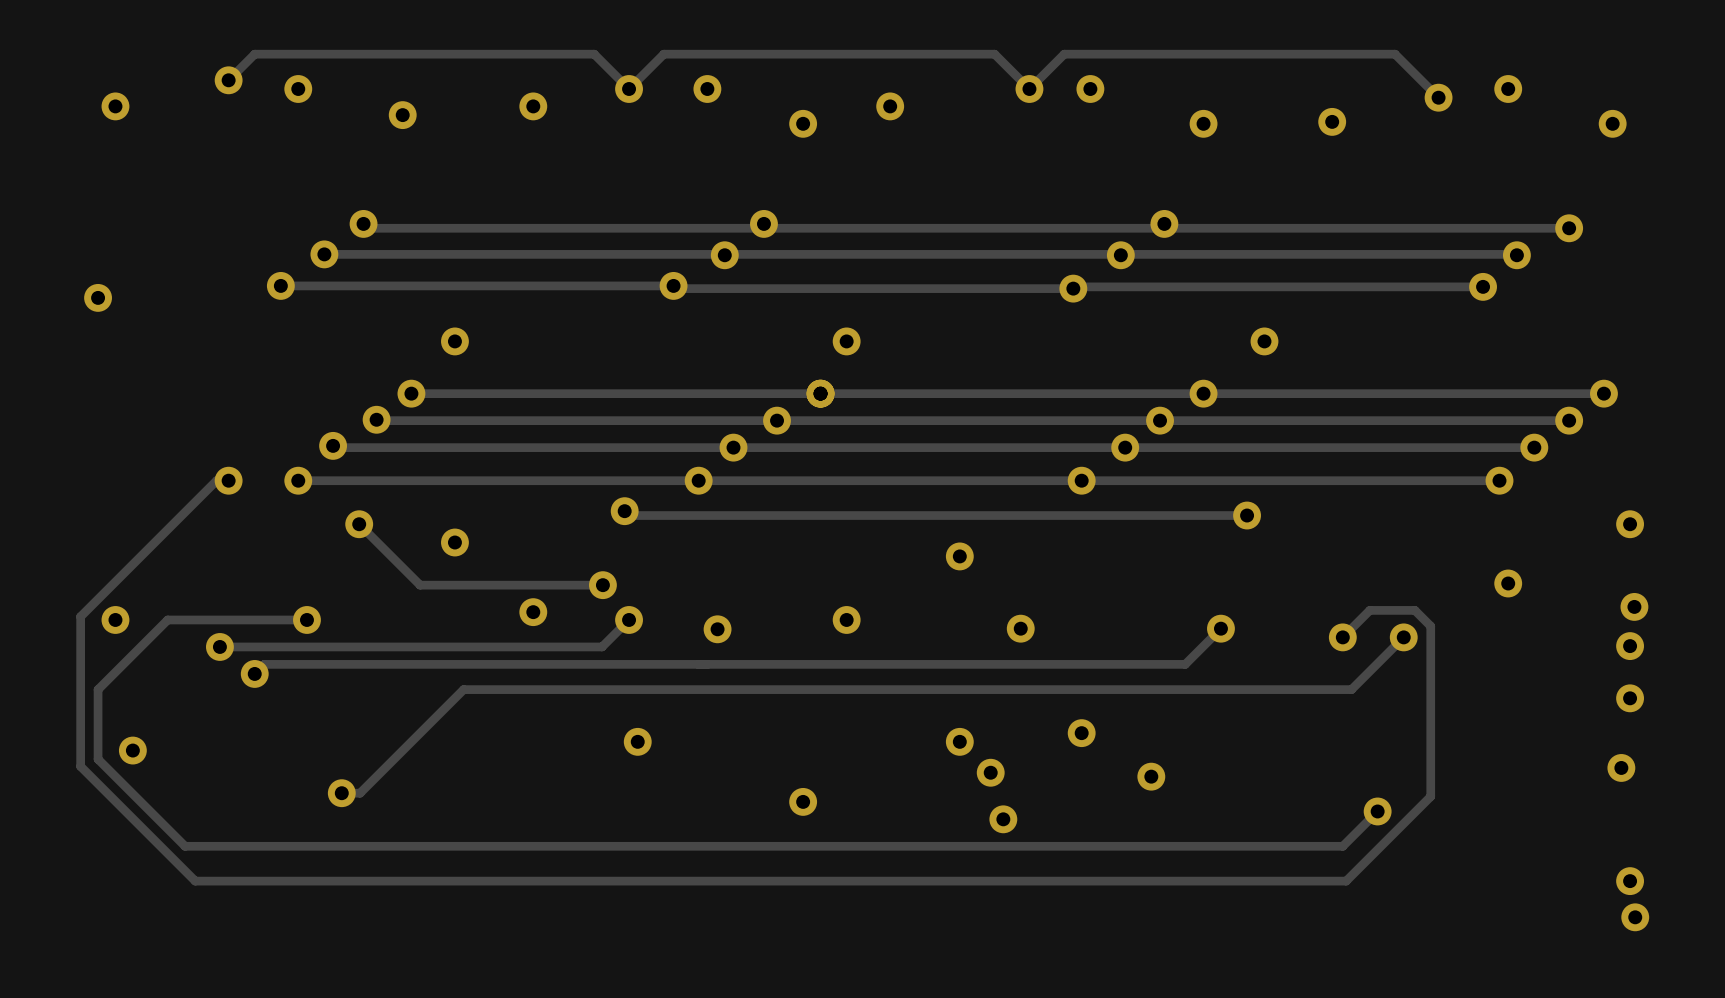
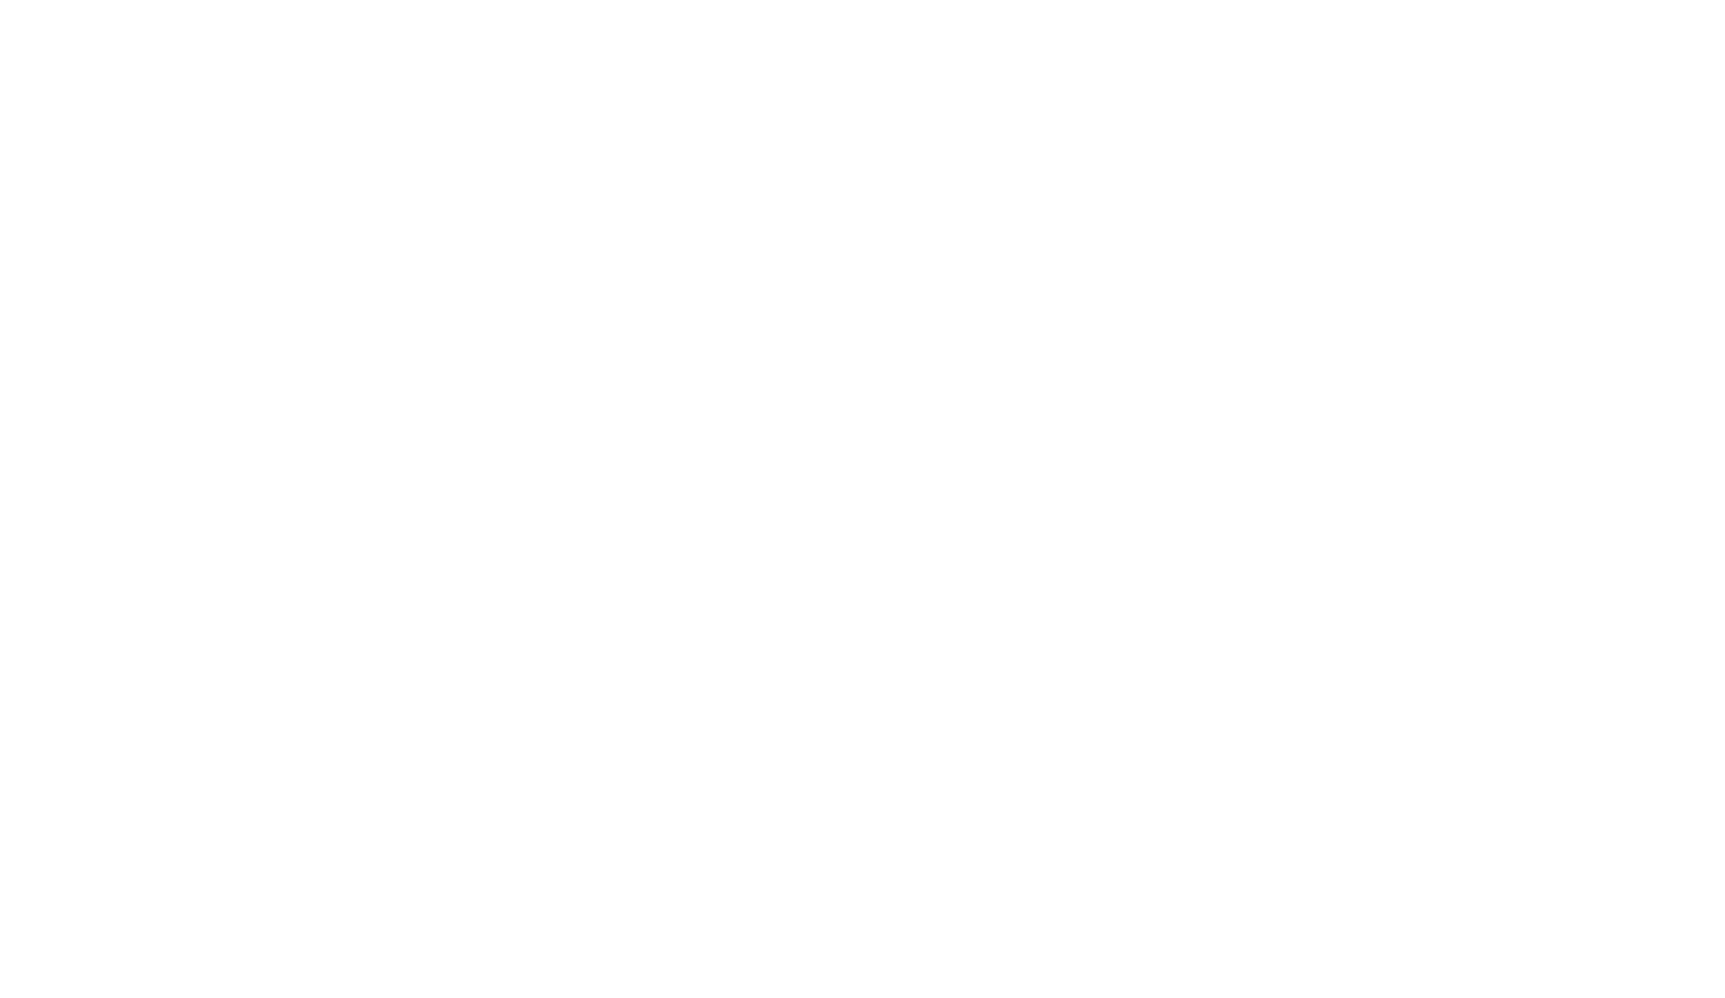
track: (228, 80) (254, 54) (594, 54) (629, 88) (663, 54) (994, 54) (1029, 88) (1064, 54) (1395, 54) (1438, 97) -> none
via: (228, 80) -> none
via: (298, 88) -> none
via: (629, 88) -> none
via: (707, 88) -> none
via: (1029, 88) -> none
via: (1090, 88) -> none
via: (1508, 88) -> none
via: (1438, 97) -> none
via: (115, 106) -> none
via: (533, 106) -> none
via: (890, 106) -> none
via: (402, 115) -> none
via: (1332, 121) -> none
via: (803, 123) -> none
via: (1203, 123) -> none
via: (1612, 123) -> none
track: (363, 223) (367, 228) (759, 228) (763, 223) (768, 228) (1160, 228) (1164, 223) (1168, 228) (1569, 228) -> none
via: (363, 223) -> none
via: (763, 223) -> none
via: (1164, 223) -> none
via: (1569, 228) -> none
track: (324, 254) (1516, 255) -> none
via: (324, 254) -> none
via: (724, 255) -> none
via: (1120, 255) -> none
via: (1516, 255) -> none
track: (280, 285) (673, 285) (676, 288) (1483, 286) -> none
via: (280, 285) -> none
via: (673, 285) -> none
via: (1483, 286) -> none
via: (1073, 288) -> none
via: (98, 297) -> none
via: (454, 341) -> none
via: (846, 341) -> none
via: (1264, 341) -> none
via: (411, 393) -> none
via: (820, 393) -> none
via: (1203, 393) -> none
track: (1603, 393) (411, 393) -> none
via: (1603, 393) -> none
track: (376, 419) (1569, 420) -> none
via: (376, 419) -> none
via: (777, 420) -> none
via: (1160, 420) -> none
via: (1569, 420) -> none
track: (333, 445) (334, 447) (1534, 447) -> none
via: (333, 445) -> none
via: (733, 447) -> none
via: (1125, 447) -> none
via: (1534, 447) -> none
track: (228, 480) (216, 480) (80, 616) (80, 766) (195, 881) (1346, 881) (1430, 796) (1430, 626) (1414, 610) (1369, 610) (1342, 637) -> none
via: (228, 480) -> none
via: (298, 480) -> none
via: (698, 480) -> none
via: (1081, 480) -> none
track: (1499, 480) (298, 480) -> none
via: (1499, 480) -> none
track: (624, 511) (629, 515) (1247, 515) -> none
via: (624, 511) -> none
via: (1247, 515) -> none
track: (359, 524) (420, 585) (602, 585) -> none
via: (359, 524) -> none
via: (1630, 524) -> none
via: (454, 542) -> none
via: (959, 556) -> none
via: (1508, 583) -> none
via: (602, 585) -> none
via: (1634, 606) -> none
via: (533, 612) -> none
via: (115, 619) -> none
track: (306, 619) (167, 619) (98, 689) (98, 759) (185, 846) (1342, 846) (1377, 811) -> none
via: (306, 619) -> none
track: (629, 619) (602, 646) (219, 646) -> none
via: (629, 619) -> none
via: (846, 619) -> none
via: (1020, 628) -> none
track: (1220, 628) (1185, 664) (264, 664) (254, 673) -> none
via: (1220, 628) -> none
via: (717, 629) -> none
via: (1342, 637) -> none
track: (1403, 637) (1351, 689) (463, 689) (360, 793) (341, 793) -> none
via: (1403, 637) -> none
via: (219, 646) -> none
via: (1630, 646) -> none
via: (254, 673) -> none
via: (1630, 698) -> none
via: (1081, 733) -> none
via: (637, 741) -> none
via: (959, 741) -> none
via: (132, 750) -> none
via: (1621, 767) -> none
via: (990, 772) -> none
via: (1151, 776) -> none
via: (341, 793) -> none
via: (803, 801) -> none
via: (1377, 811) -> none
via: (1003, 819) -> none
via: (1630, 881) -> none
via: (1635, 917) -> none

